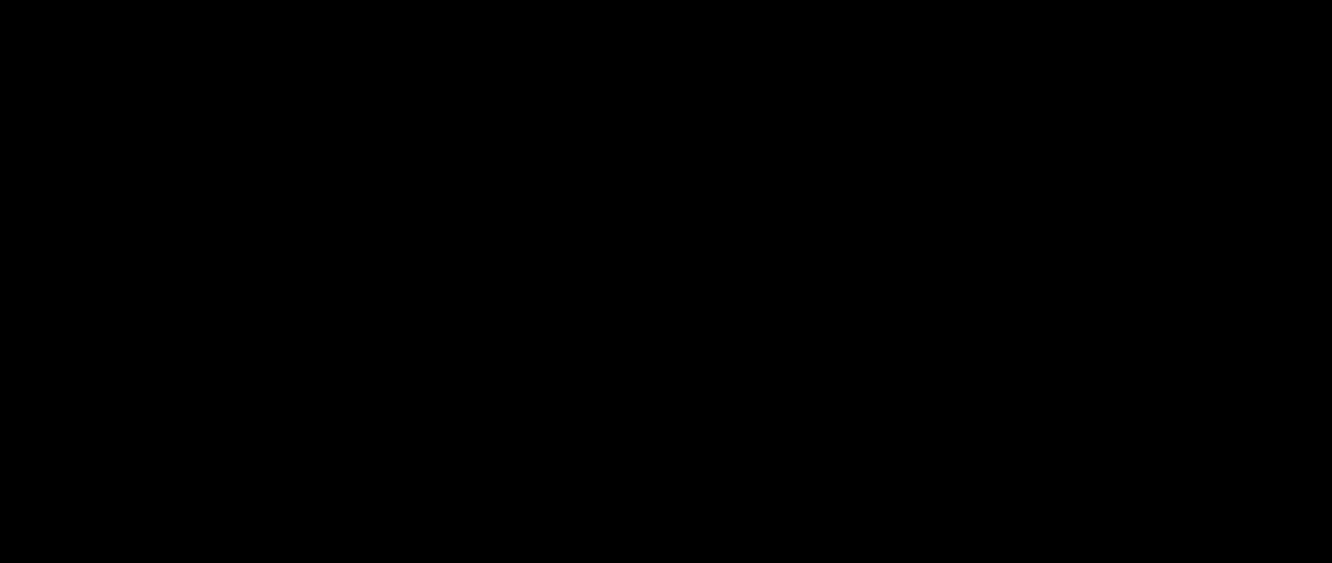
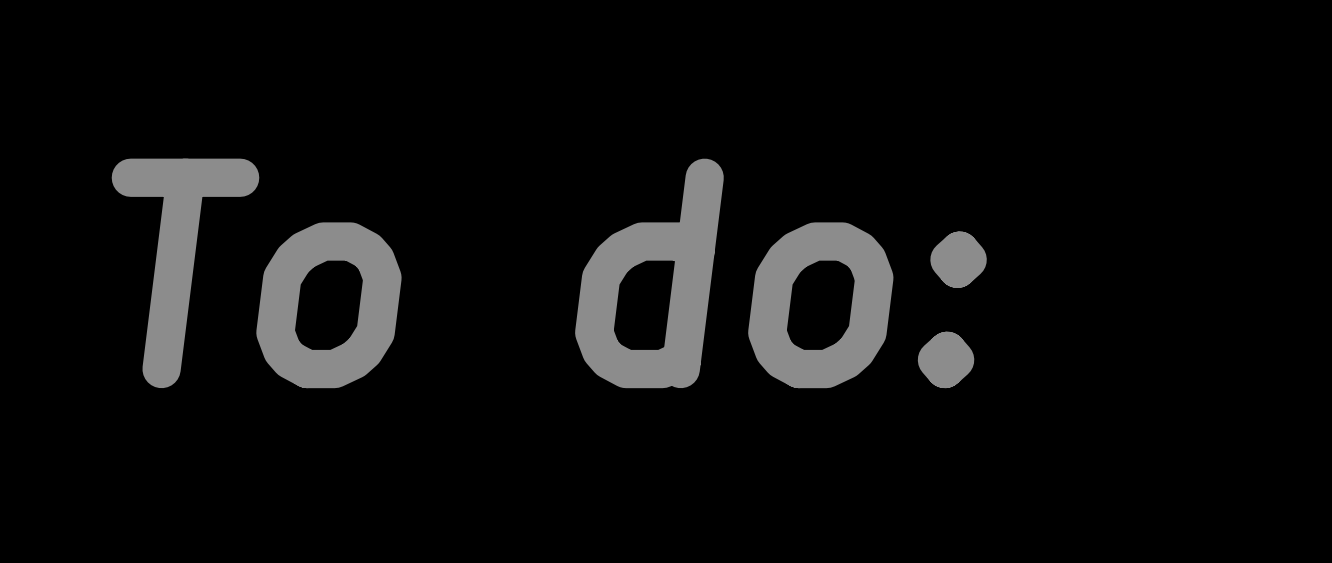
text: none -> To do: (549, 273)

